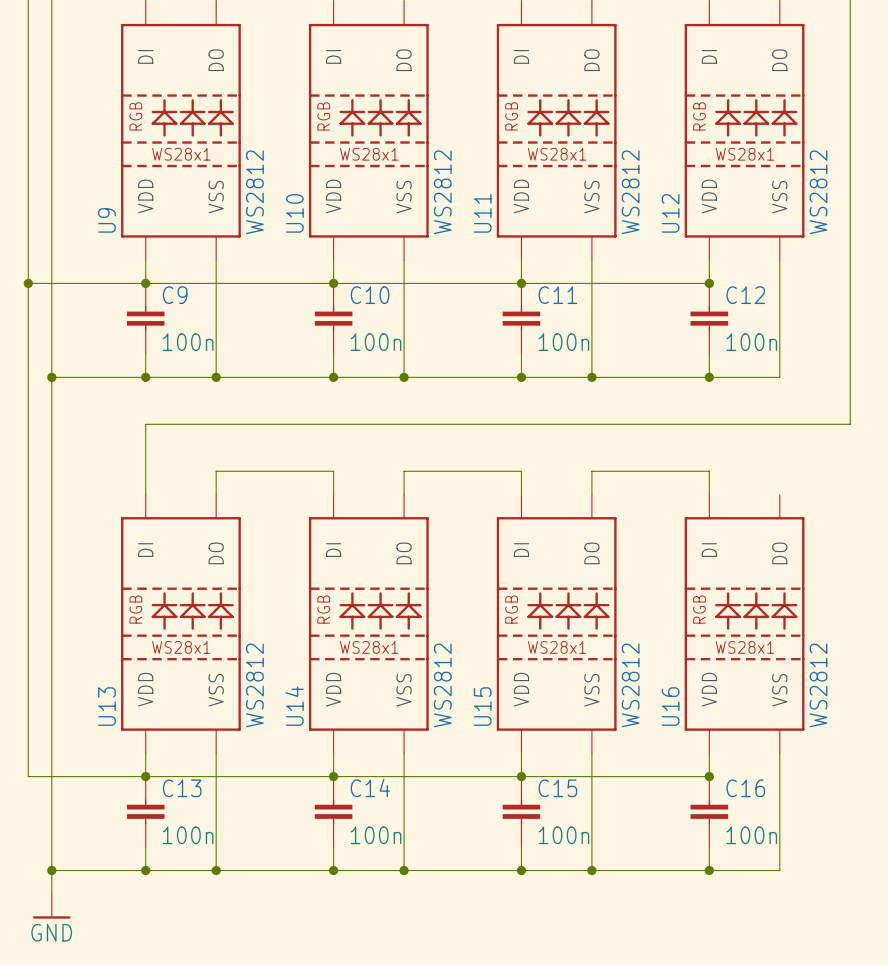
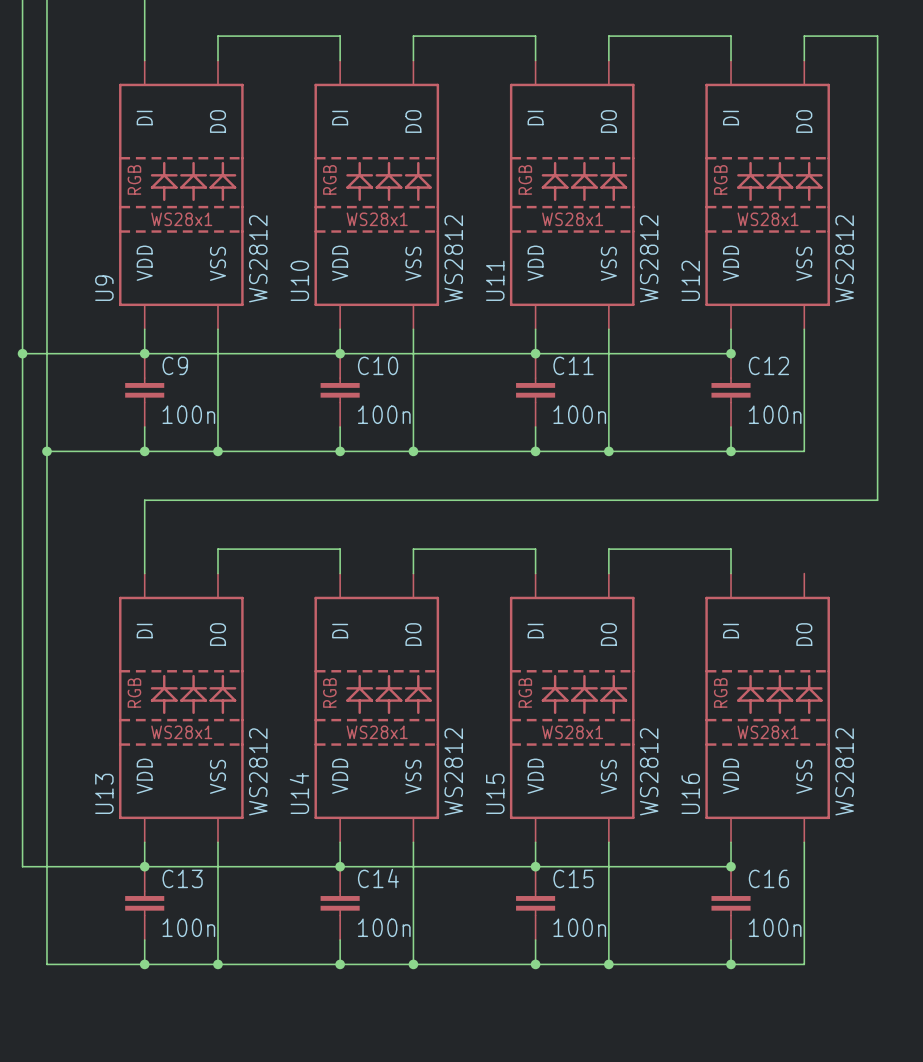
wire: (51, 870) (51, 894) -> none
junction: (51, 870) -> none
power symbol: GND (51, 906) -> none

